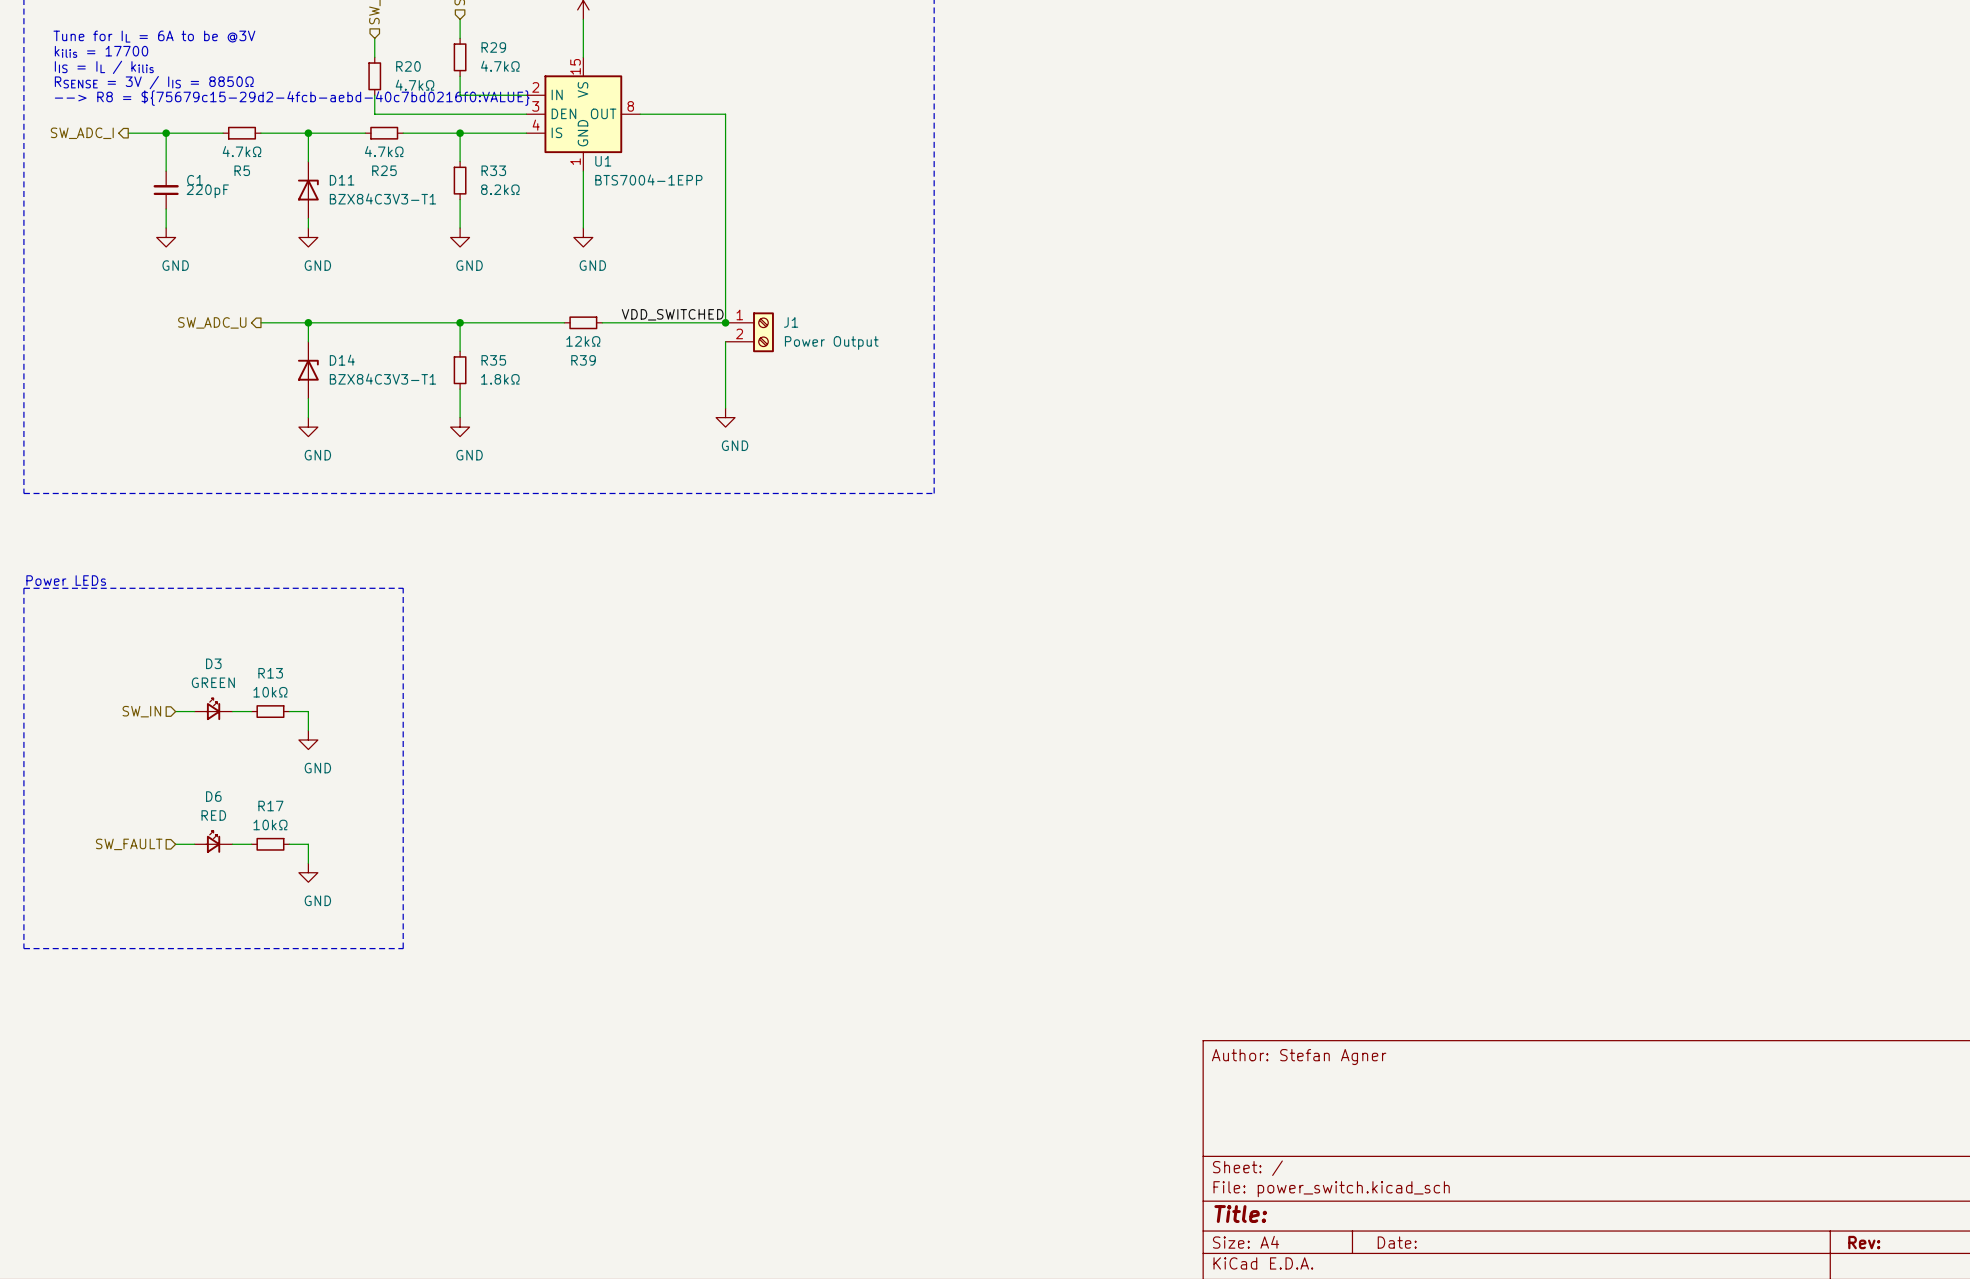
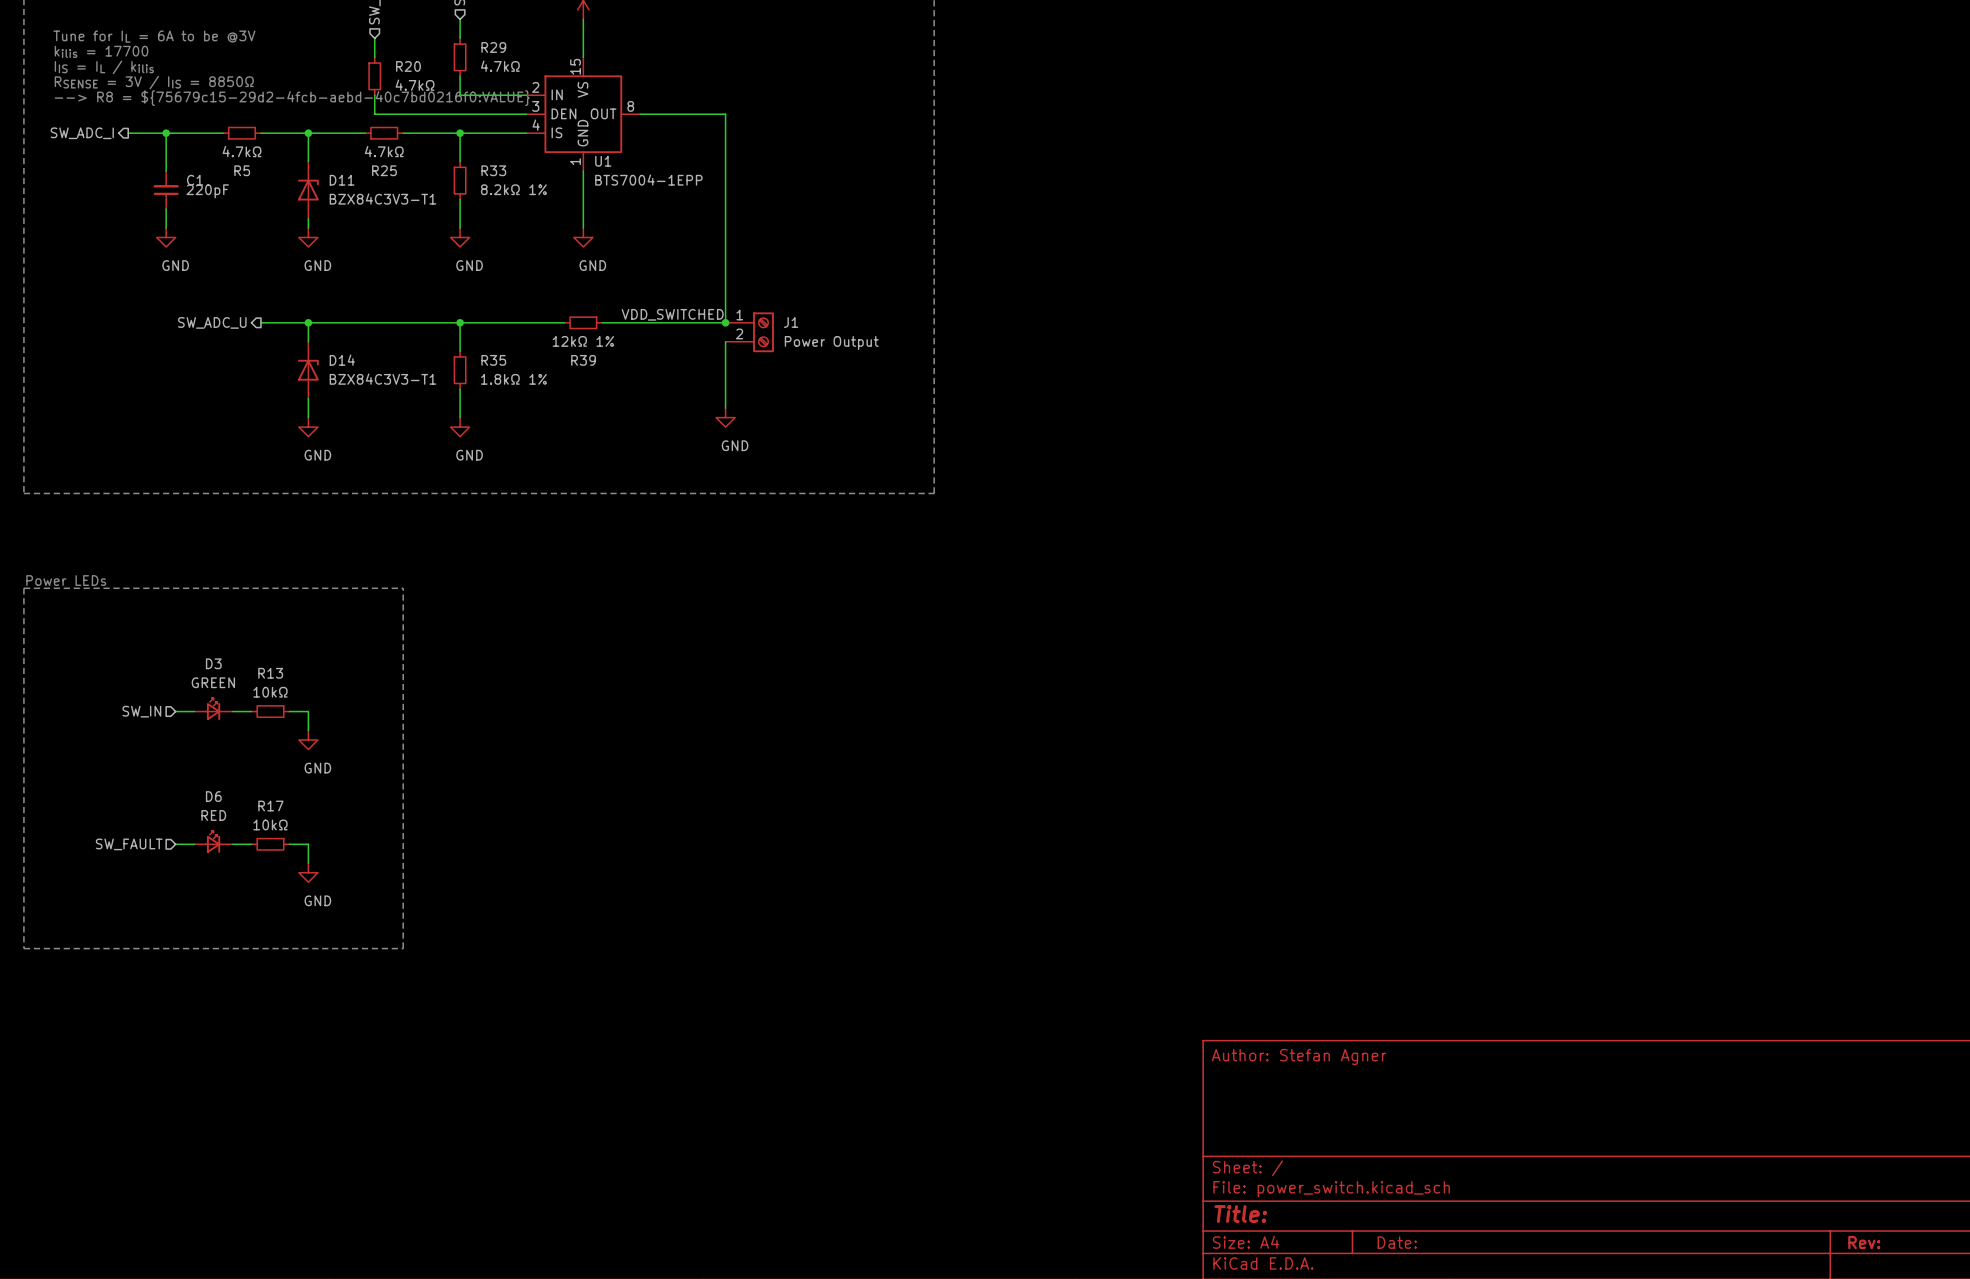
R33 value: 8.2kΩ (500, 189) -> 8.2kΩ 1% (513, 189)
R39 value: 12kΩ (583, 341) -> 12kΩ 1% (583, 341)
R35 value: 1.8kΩ (500, 379) -> 1.8kΩ 1% (513, 379)

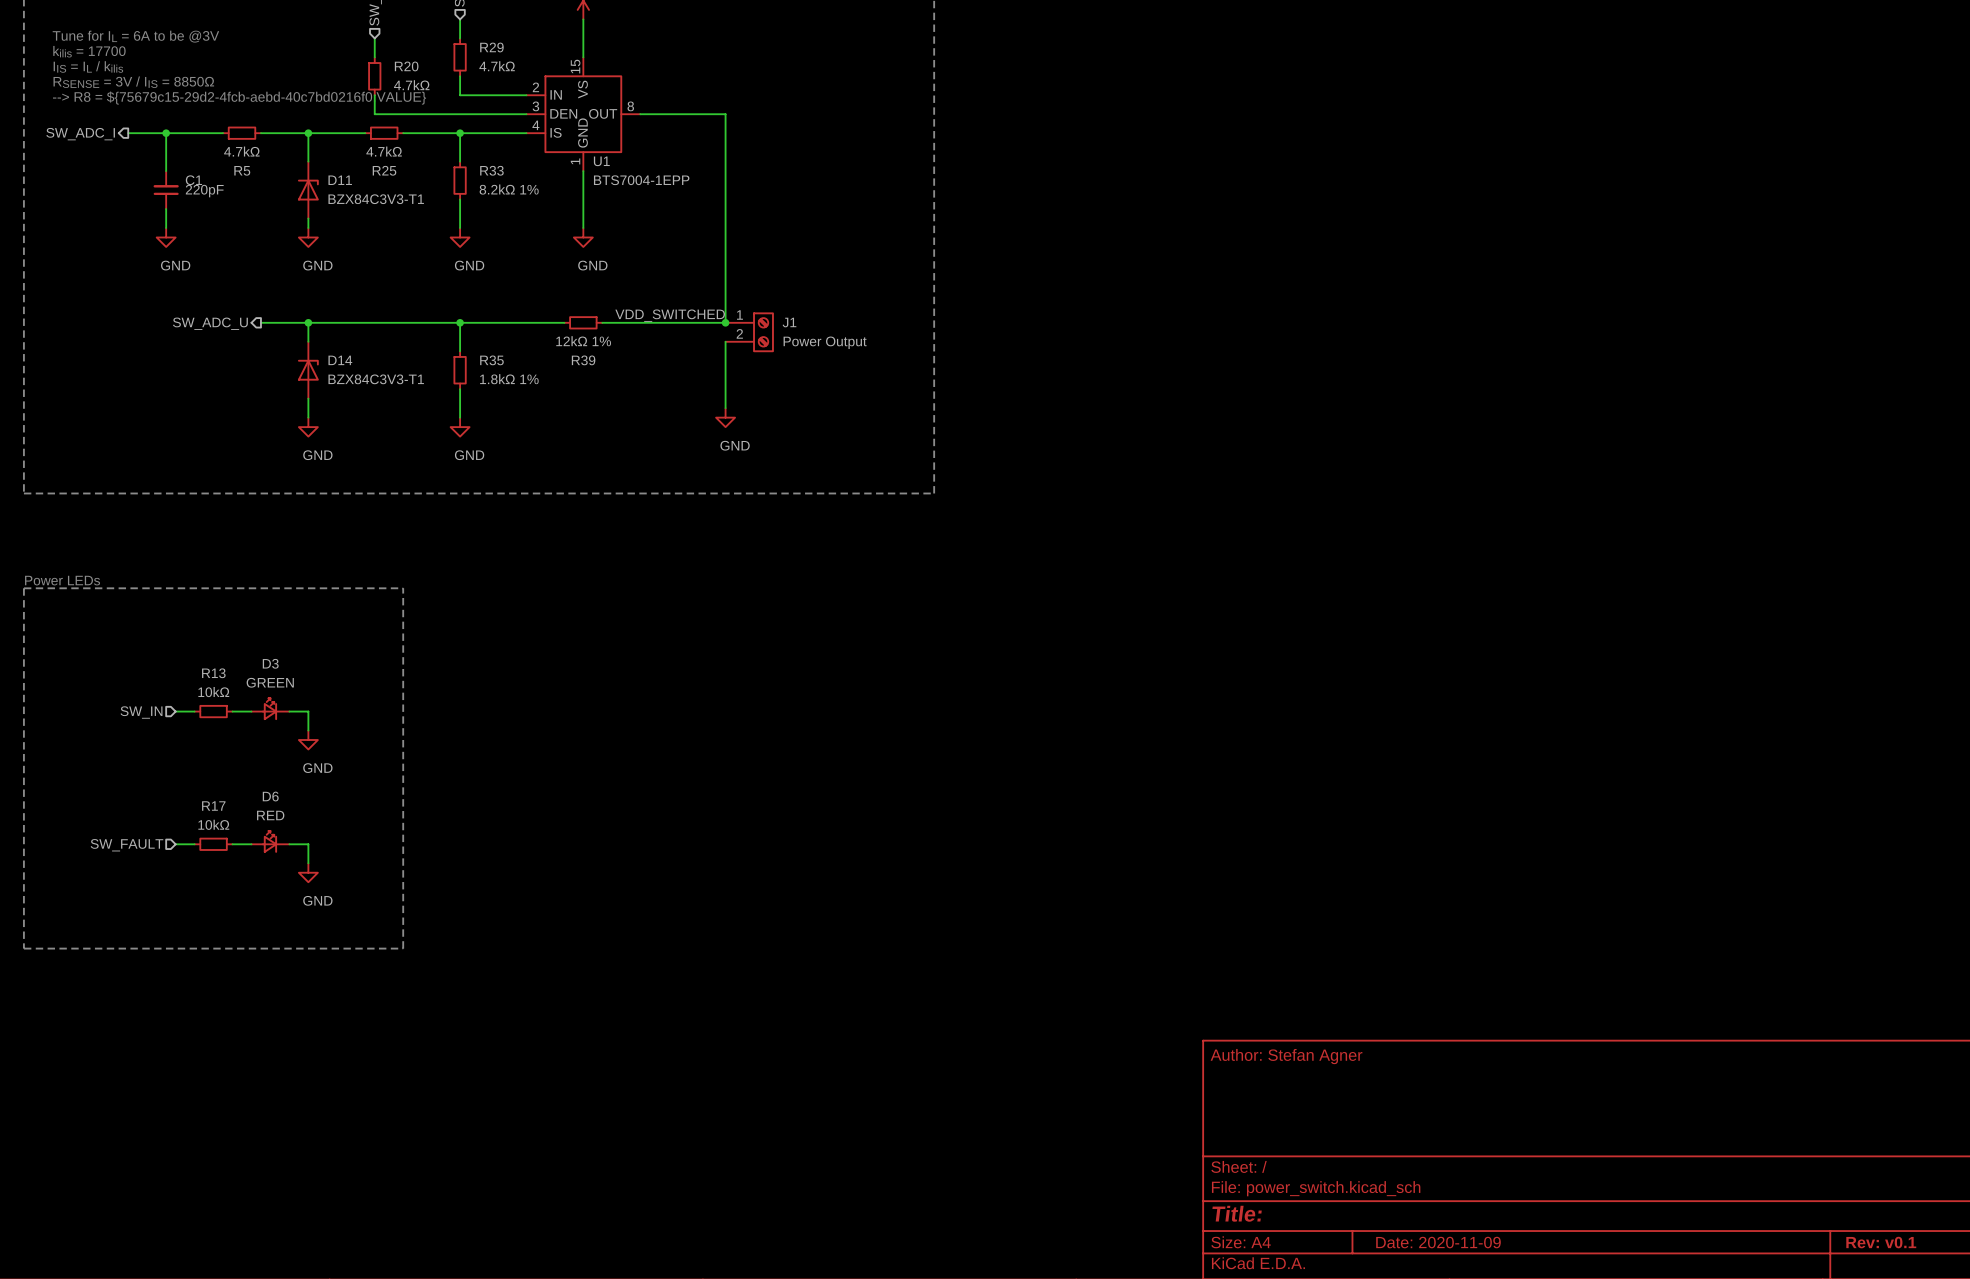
D3 position: (213, 709) -> (270, 709)
R13 position: (270, 711) -> (213, 711)
D6 position: (213, 841) -> (270, 841)
R17 position: (270, 844) -> (213, 844)
title block: Date: (1397, 1242) -> Date: 2020-11-09 (1438, 1242)
title block: Rev: (1864, 1242) -> Rev: v0.1 (1881, 1242)

